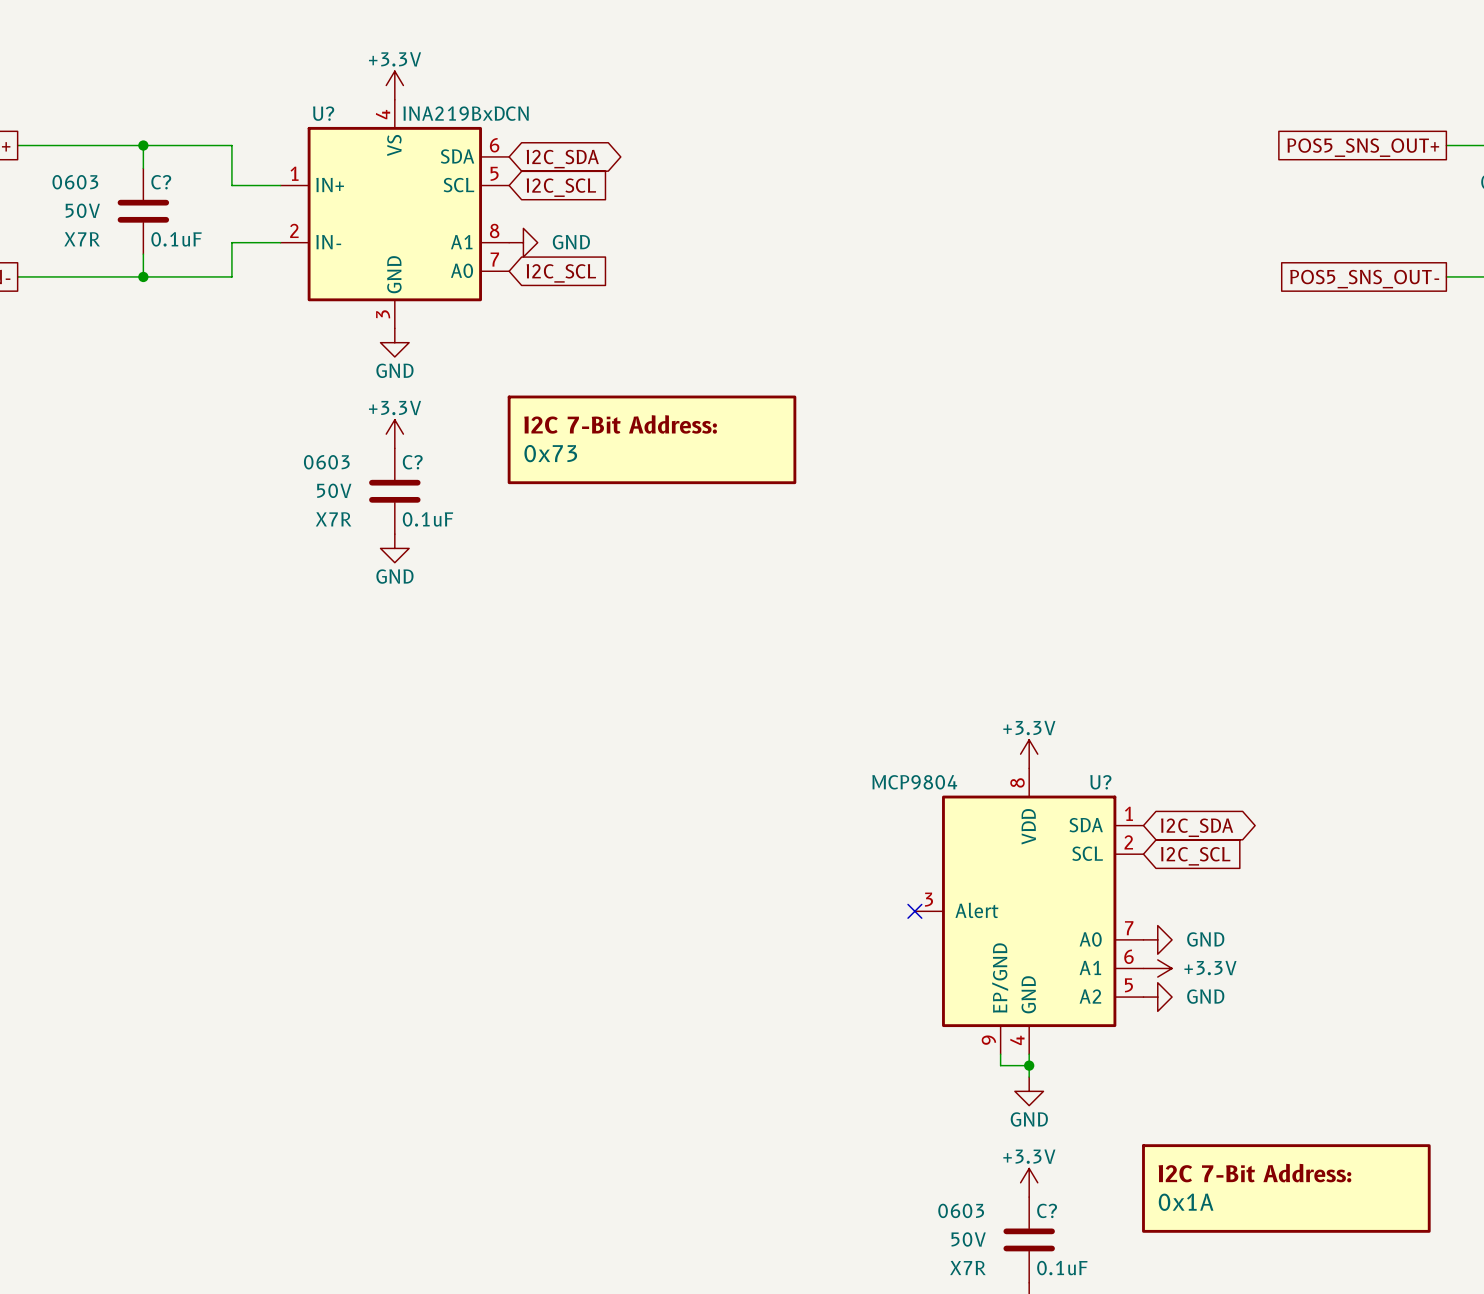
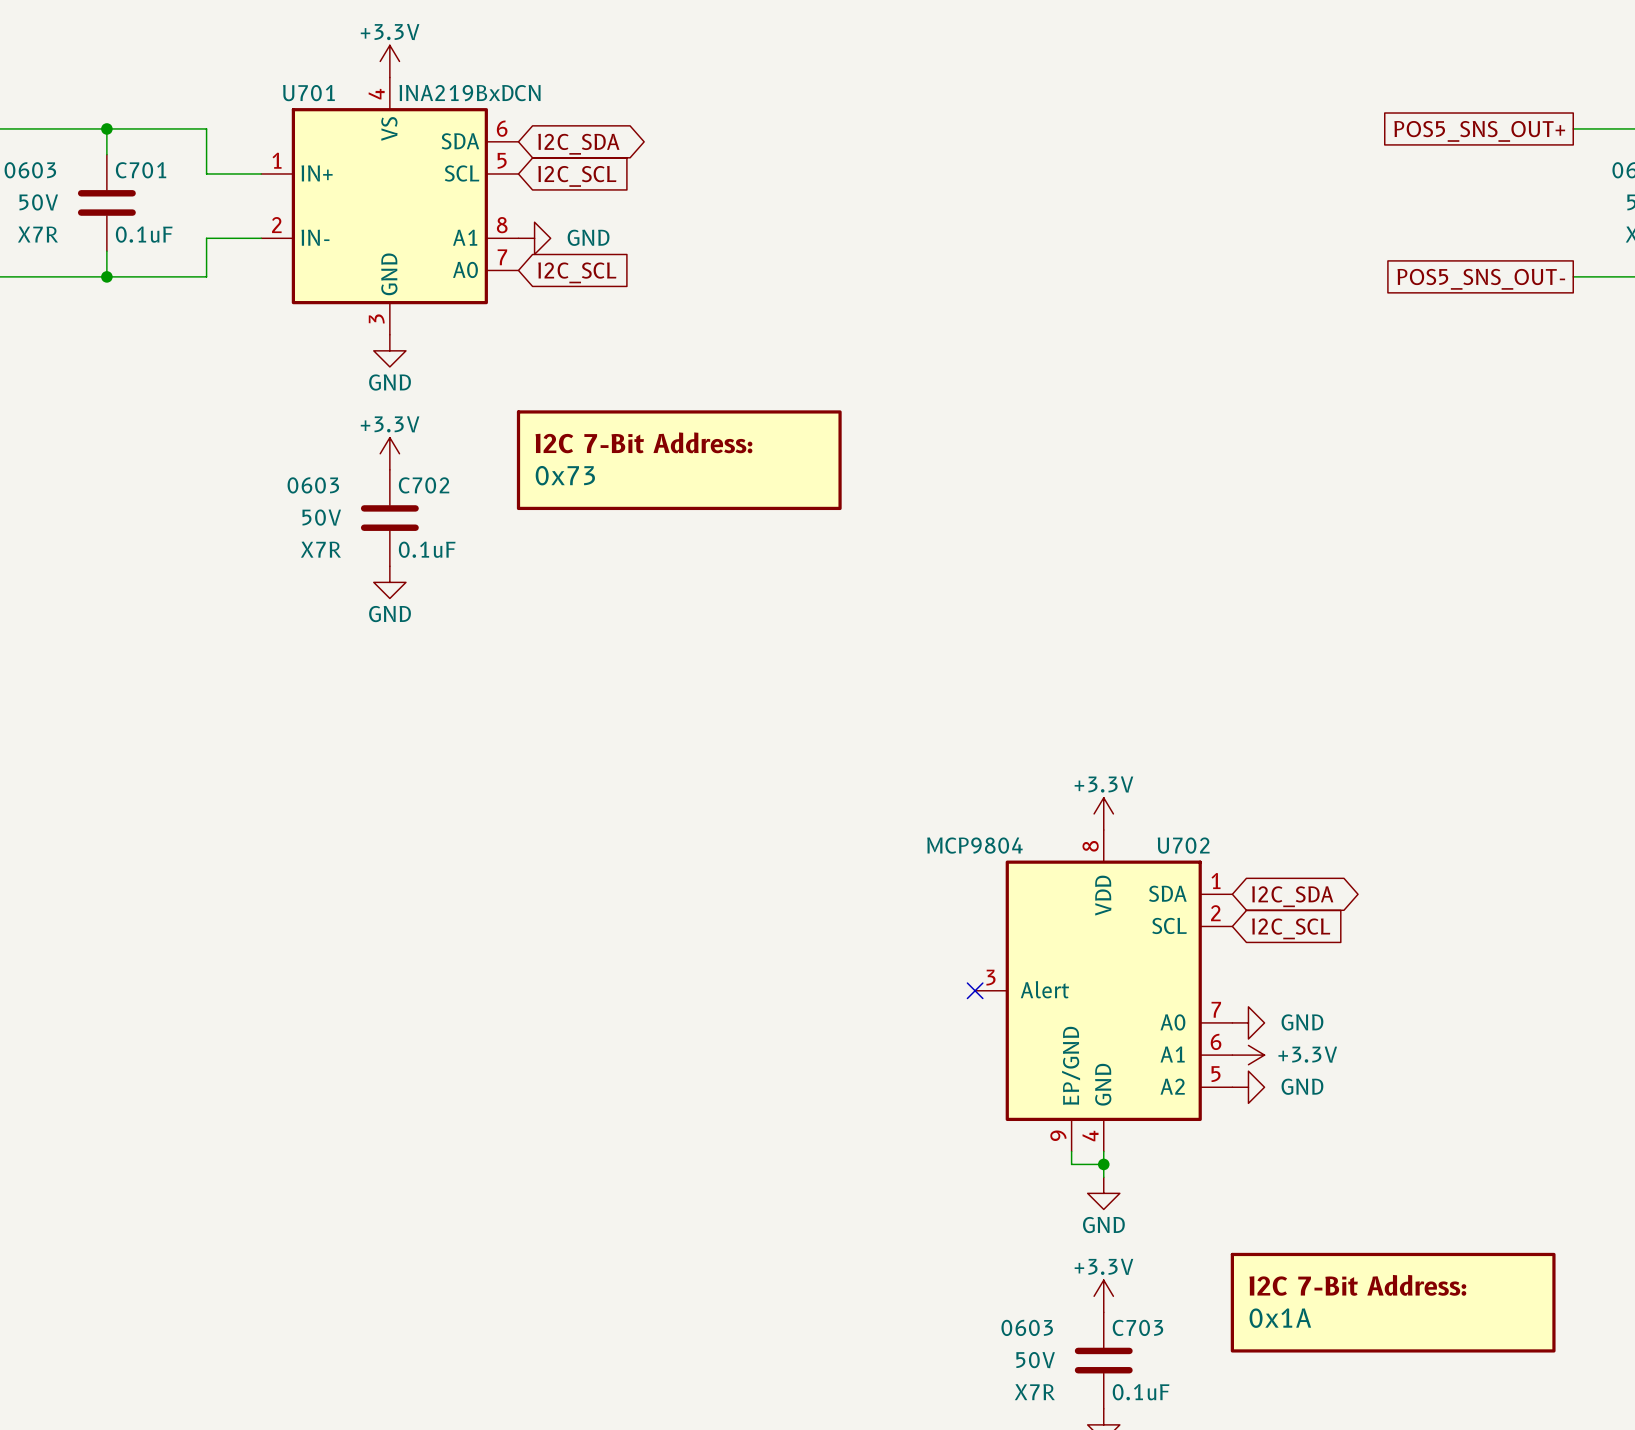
U? name: U? (323, 113) -> U701 (308, 93)
C? name: C? (161, 182) -> C701 (141, 170)
C? name: C? (412, 462) -> C702 (424, 485)
U? name: U? (1100, 782) -> U702 (1183, 845)
C? name: C? (1047, 1210) -> C703 (1137, 1327)

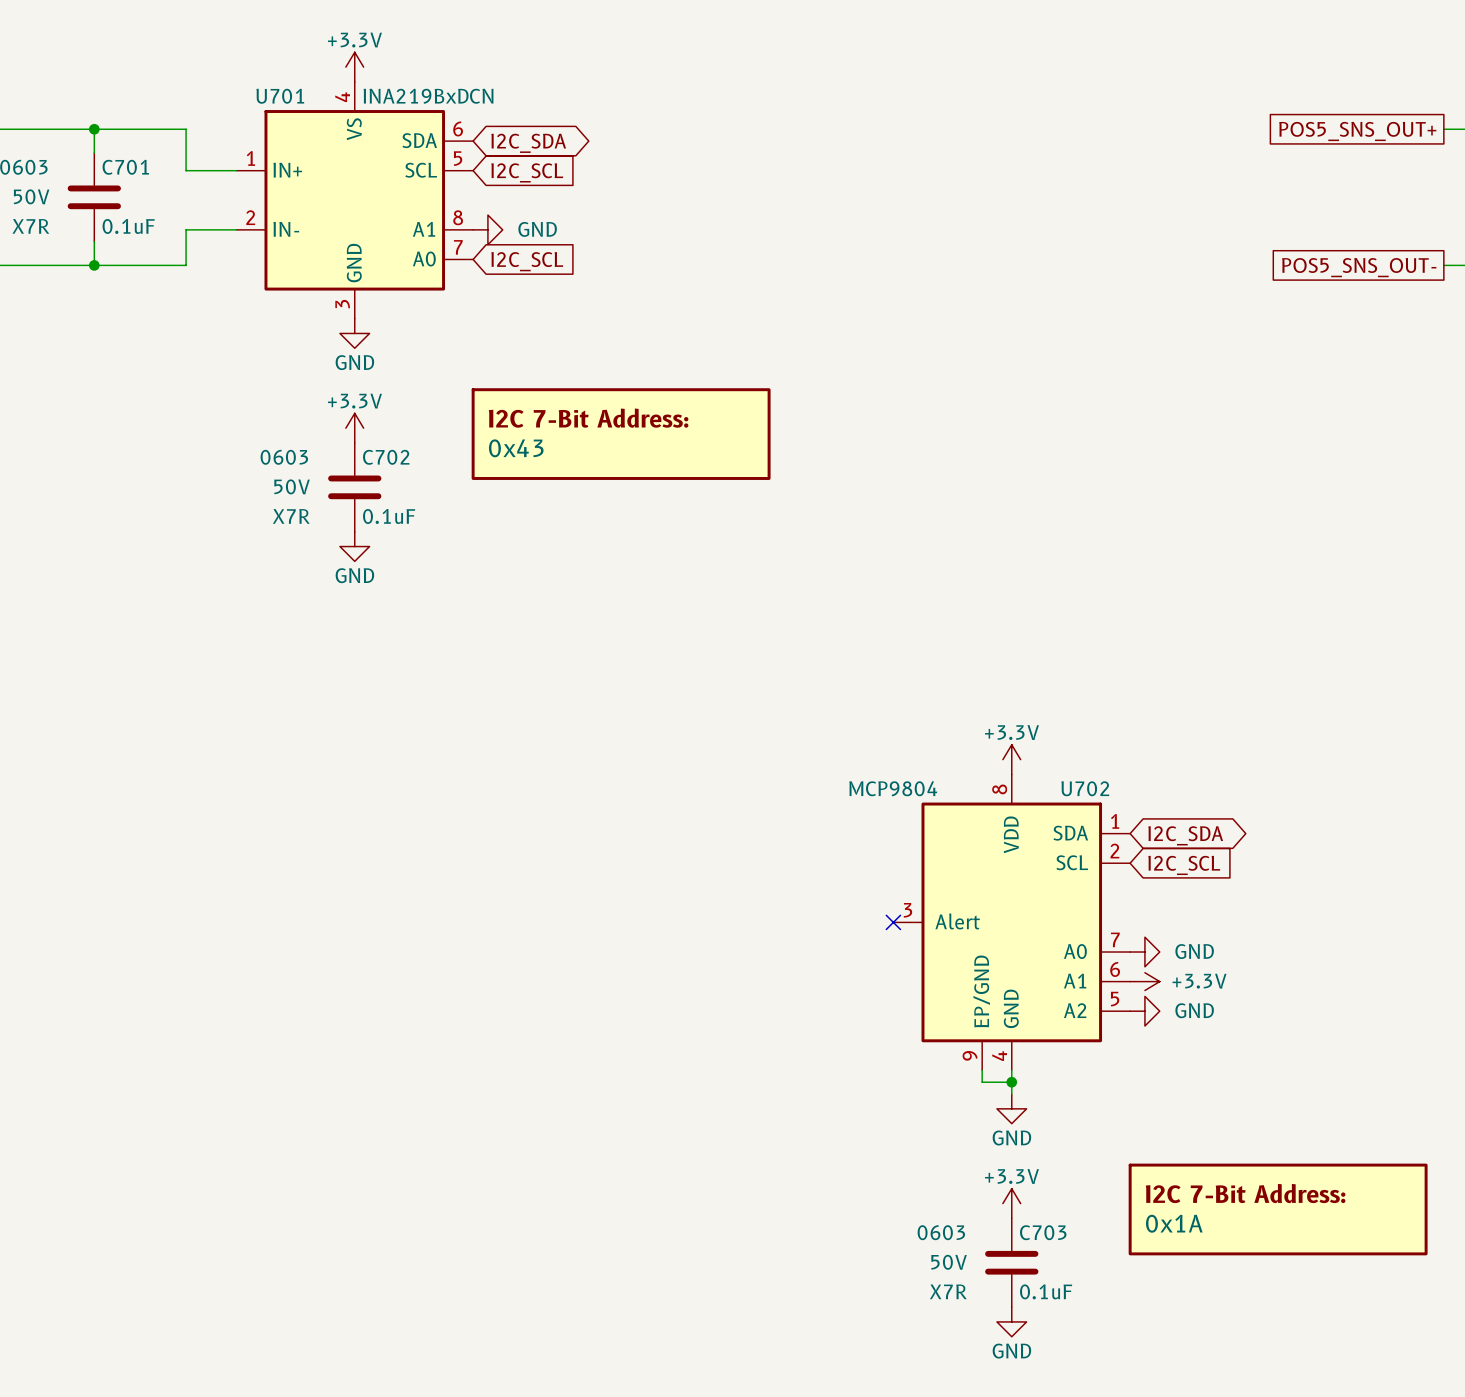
part value: 0x73 (565, 475) -> 0x43 (516, 448)

